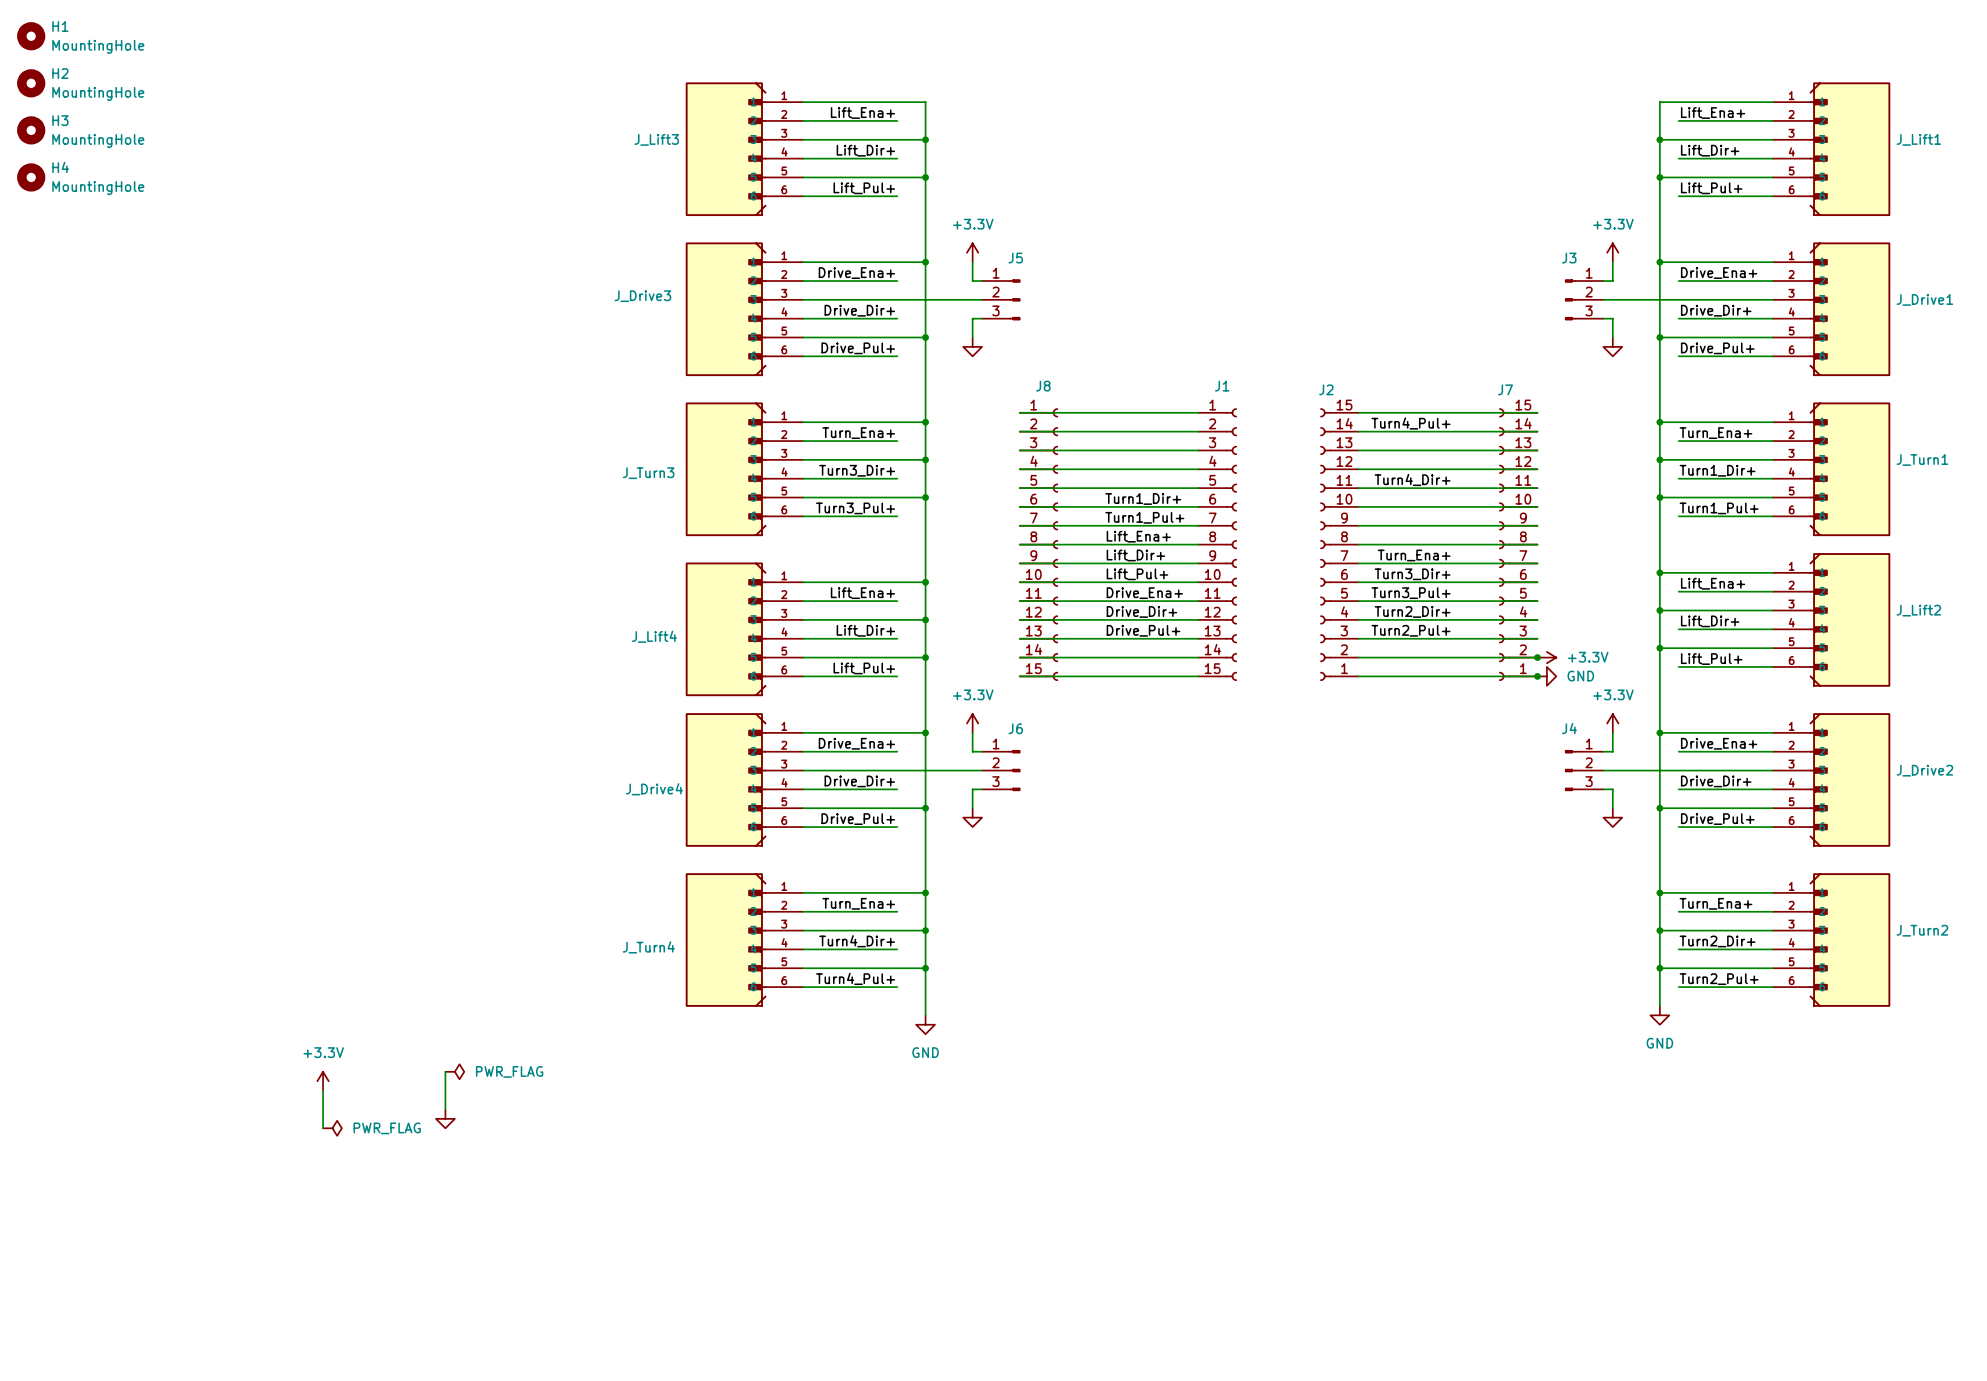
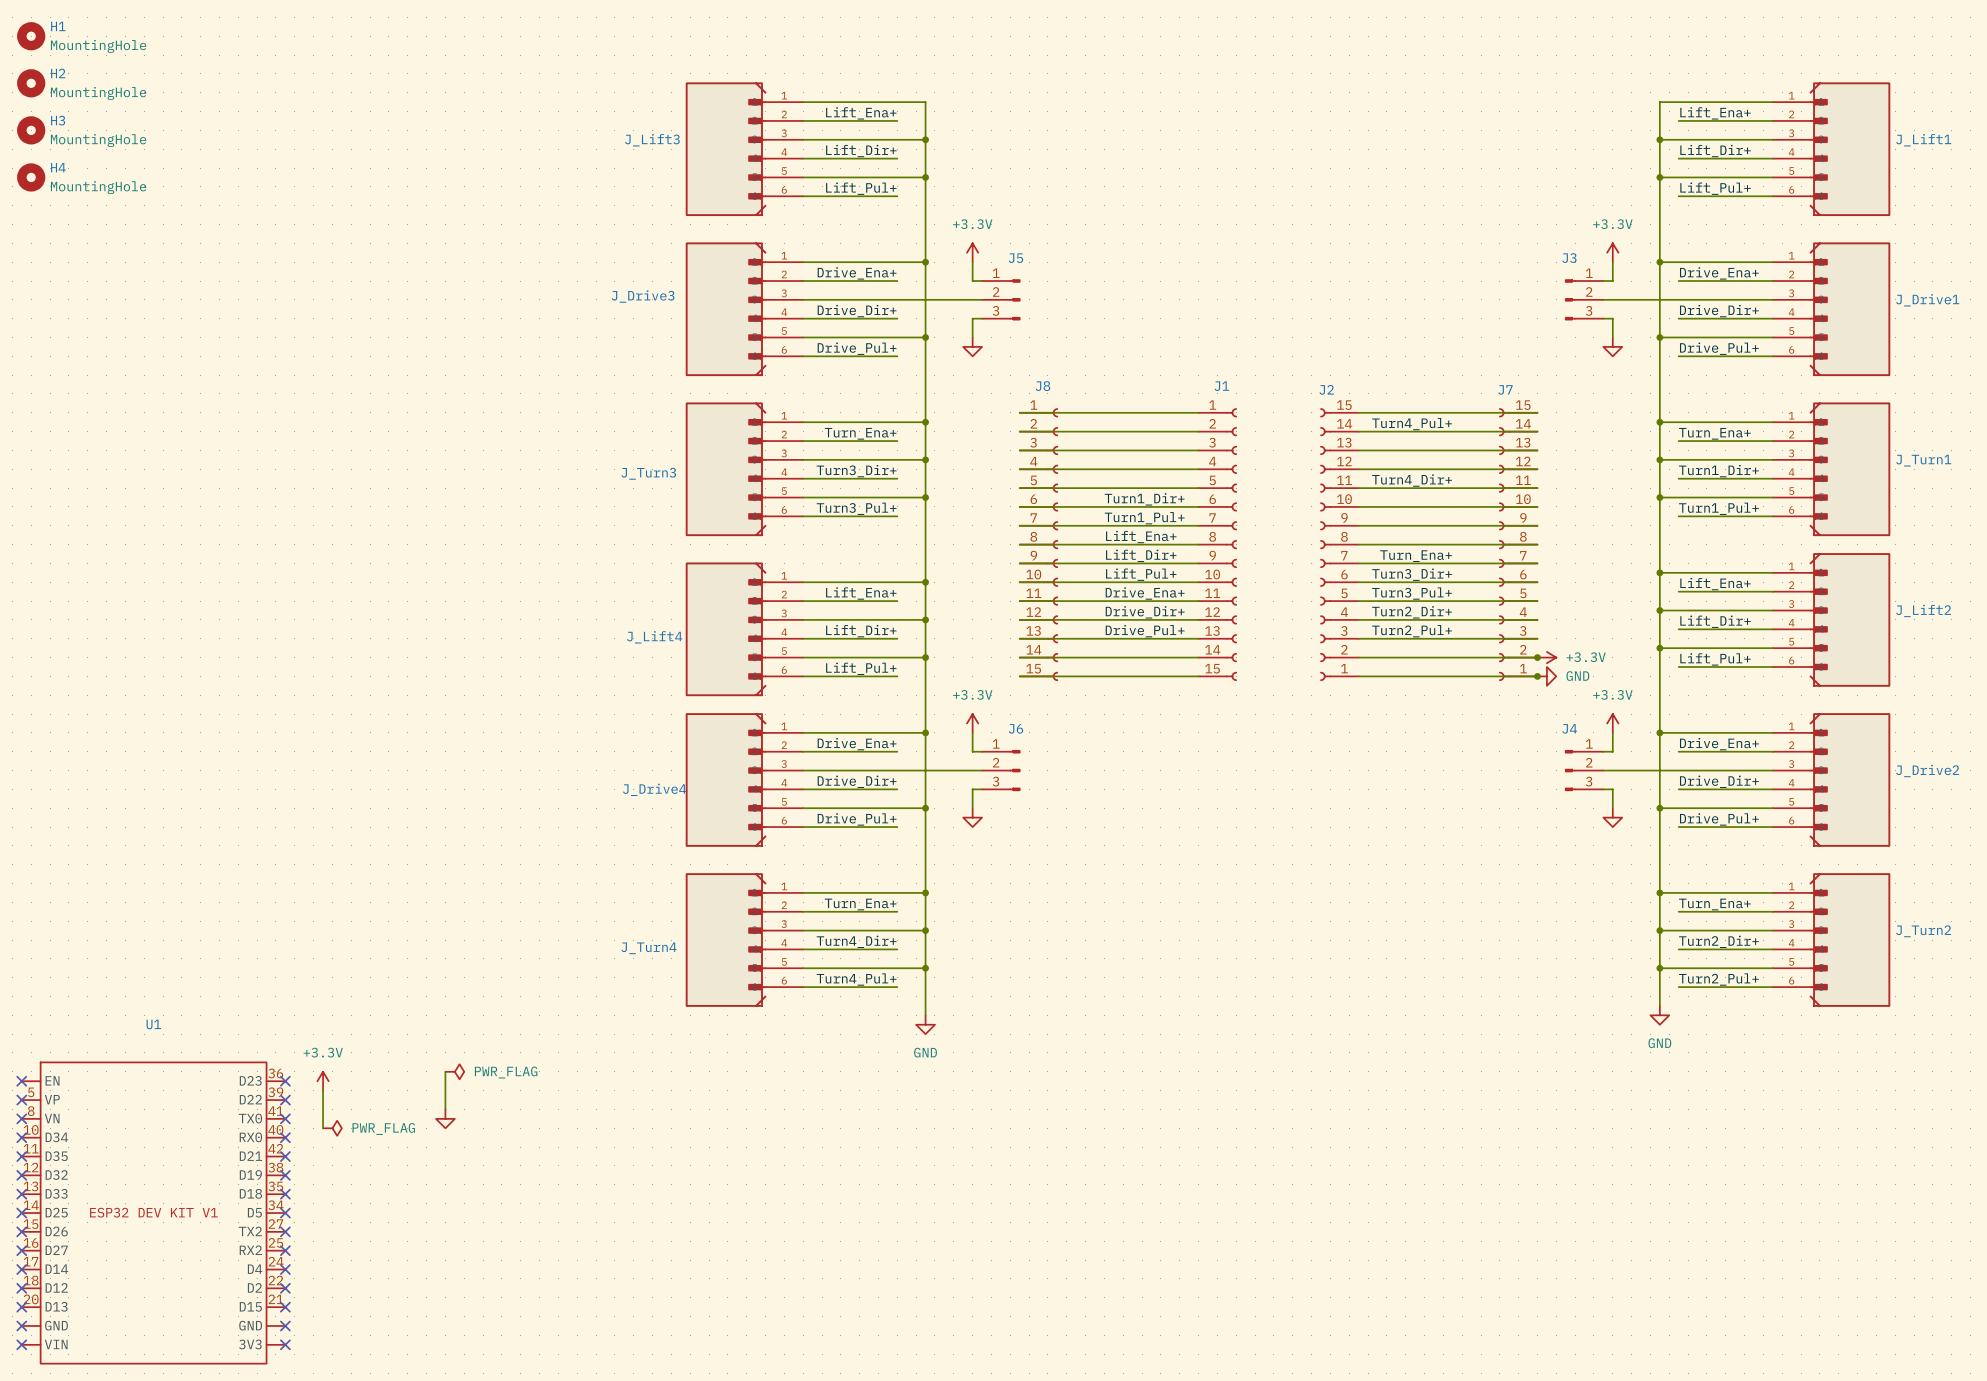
no-connect mark: none -> (21, 1081)
no-connect mark: none -> (285, 1081)
no-connect mark: none -> (21, 1100)
no-connect mark: none -> (285, 1100)
no-connect mark: none -> (21, 1118)
no-connect mark: none -> (285, 1118)
no-connect mark: none -> (21, 1137)
no-connect mark: none -> (285, 1137)
no-connect mark: none -> (21, 1156)
no-connect mark: none -> (285, 1156)
no-connect mark: none -> (21, 1175)
no-connect mark: none -> (285, 1175)
no-connect mark: none -> (21, 1194)
no-connect mark: none -> (285, 1194)
no-connect mark: none -> (21, 1213)
U1: none -> (153, 1213)
no-connect mark: none -> (285, 1213)
no-connect mark: none -> (21, 1231)
no-connect mark: none -> (285, 1231)
no-connect mark: none -> (21, 1250)
no-connect mark: none -> (285, 1250)
no-connect mark: none -> (21, 1269)
no-connect mark: none -> (285, 1269)
no-connect mark: none -> (21, 1288)
no-connect mark: none -> (285, 1288)
no-connect mark: none -> (21, 1307)
no-connect mark: none -> (285, 1307)
no-connect mark: none -> (21, 1326)
no-connect mark: none -> (285, 1326)
no-connect mark: none -> (21, 1344)
no-connect mark: none -> (285, 1344)

